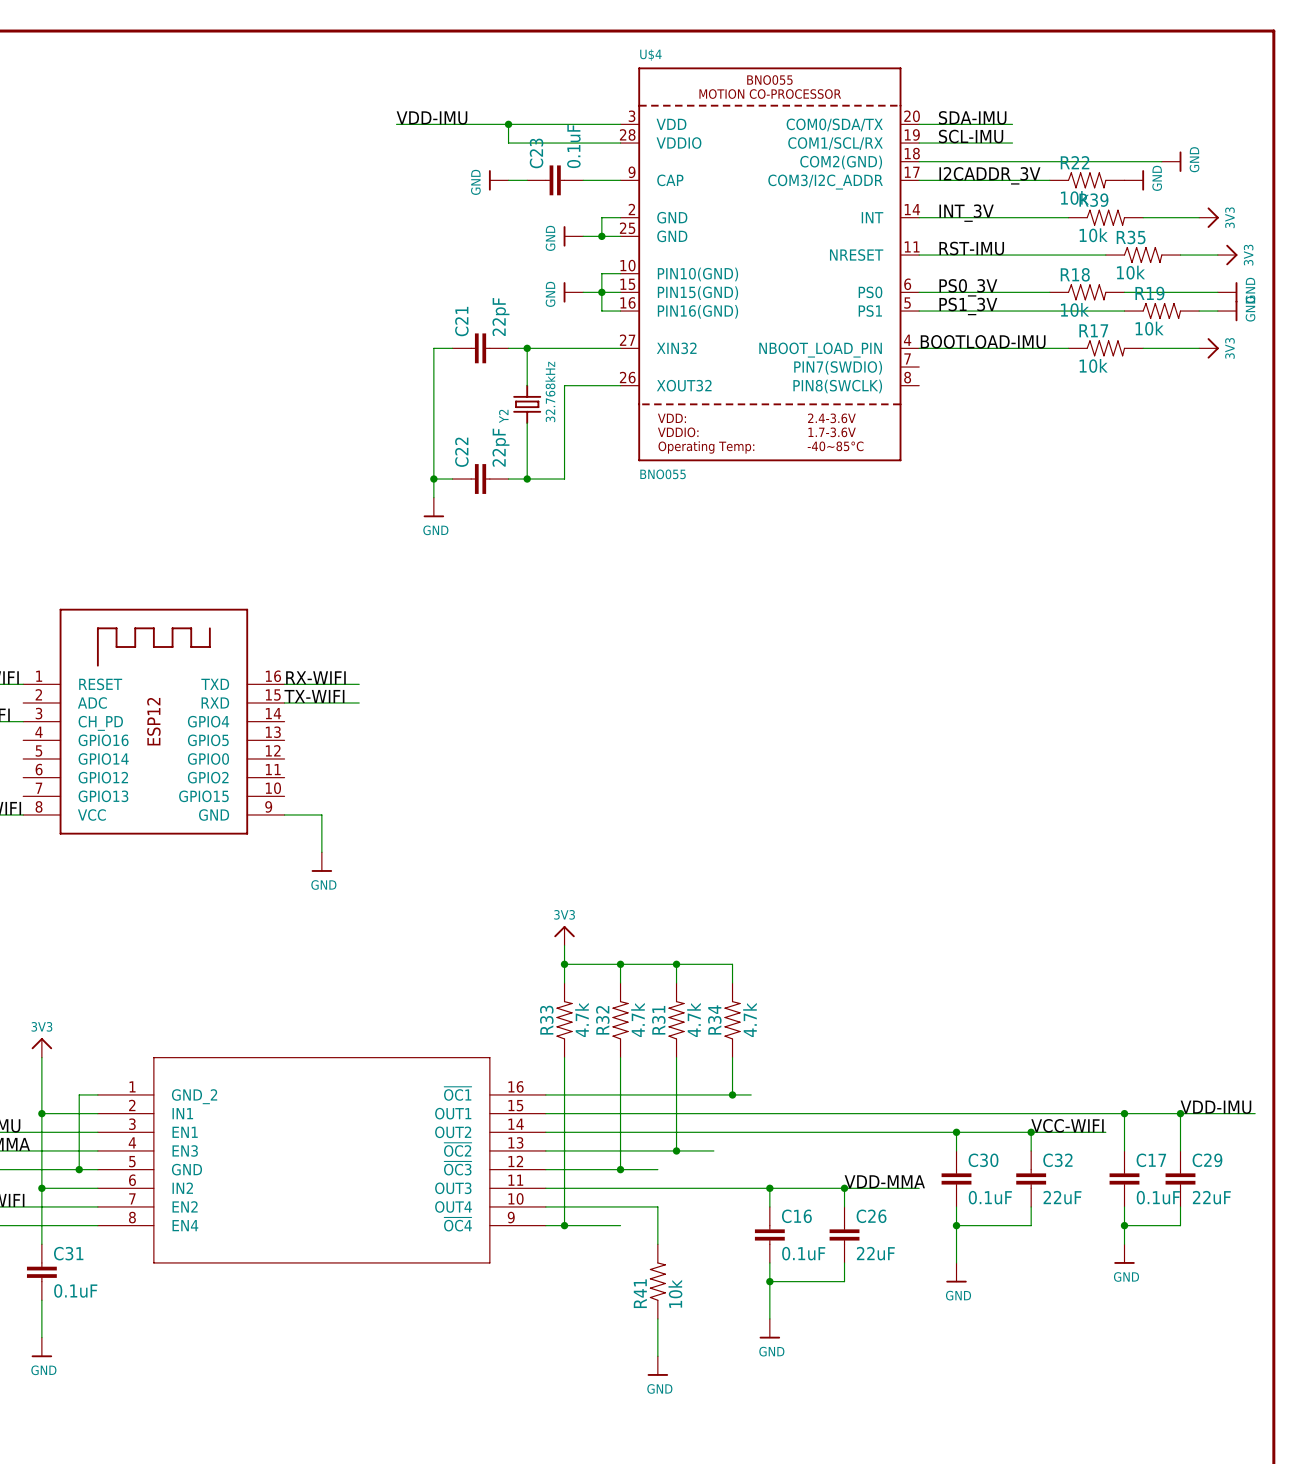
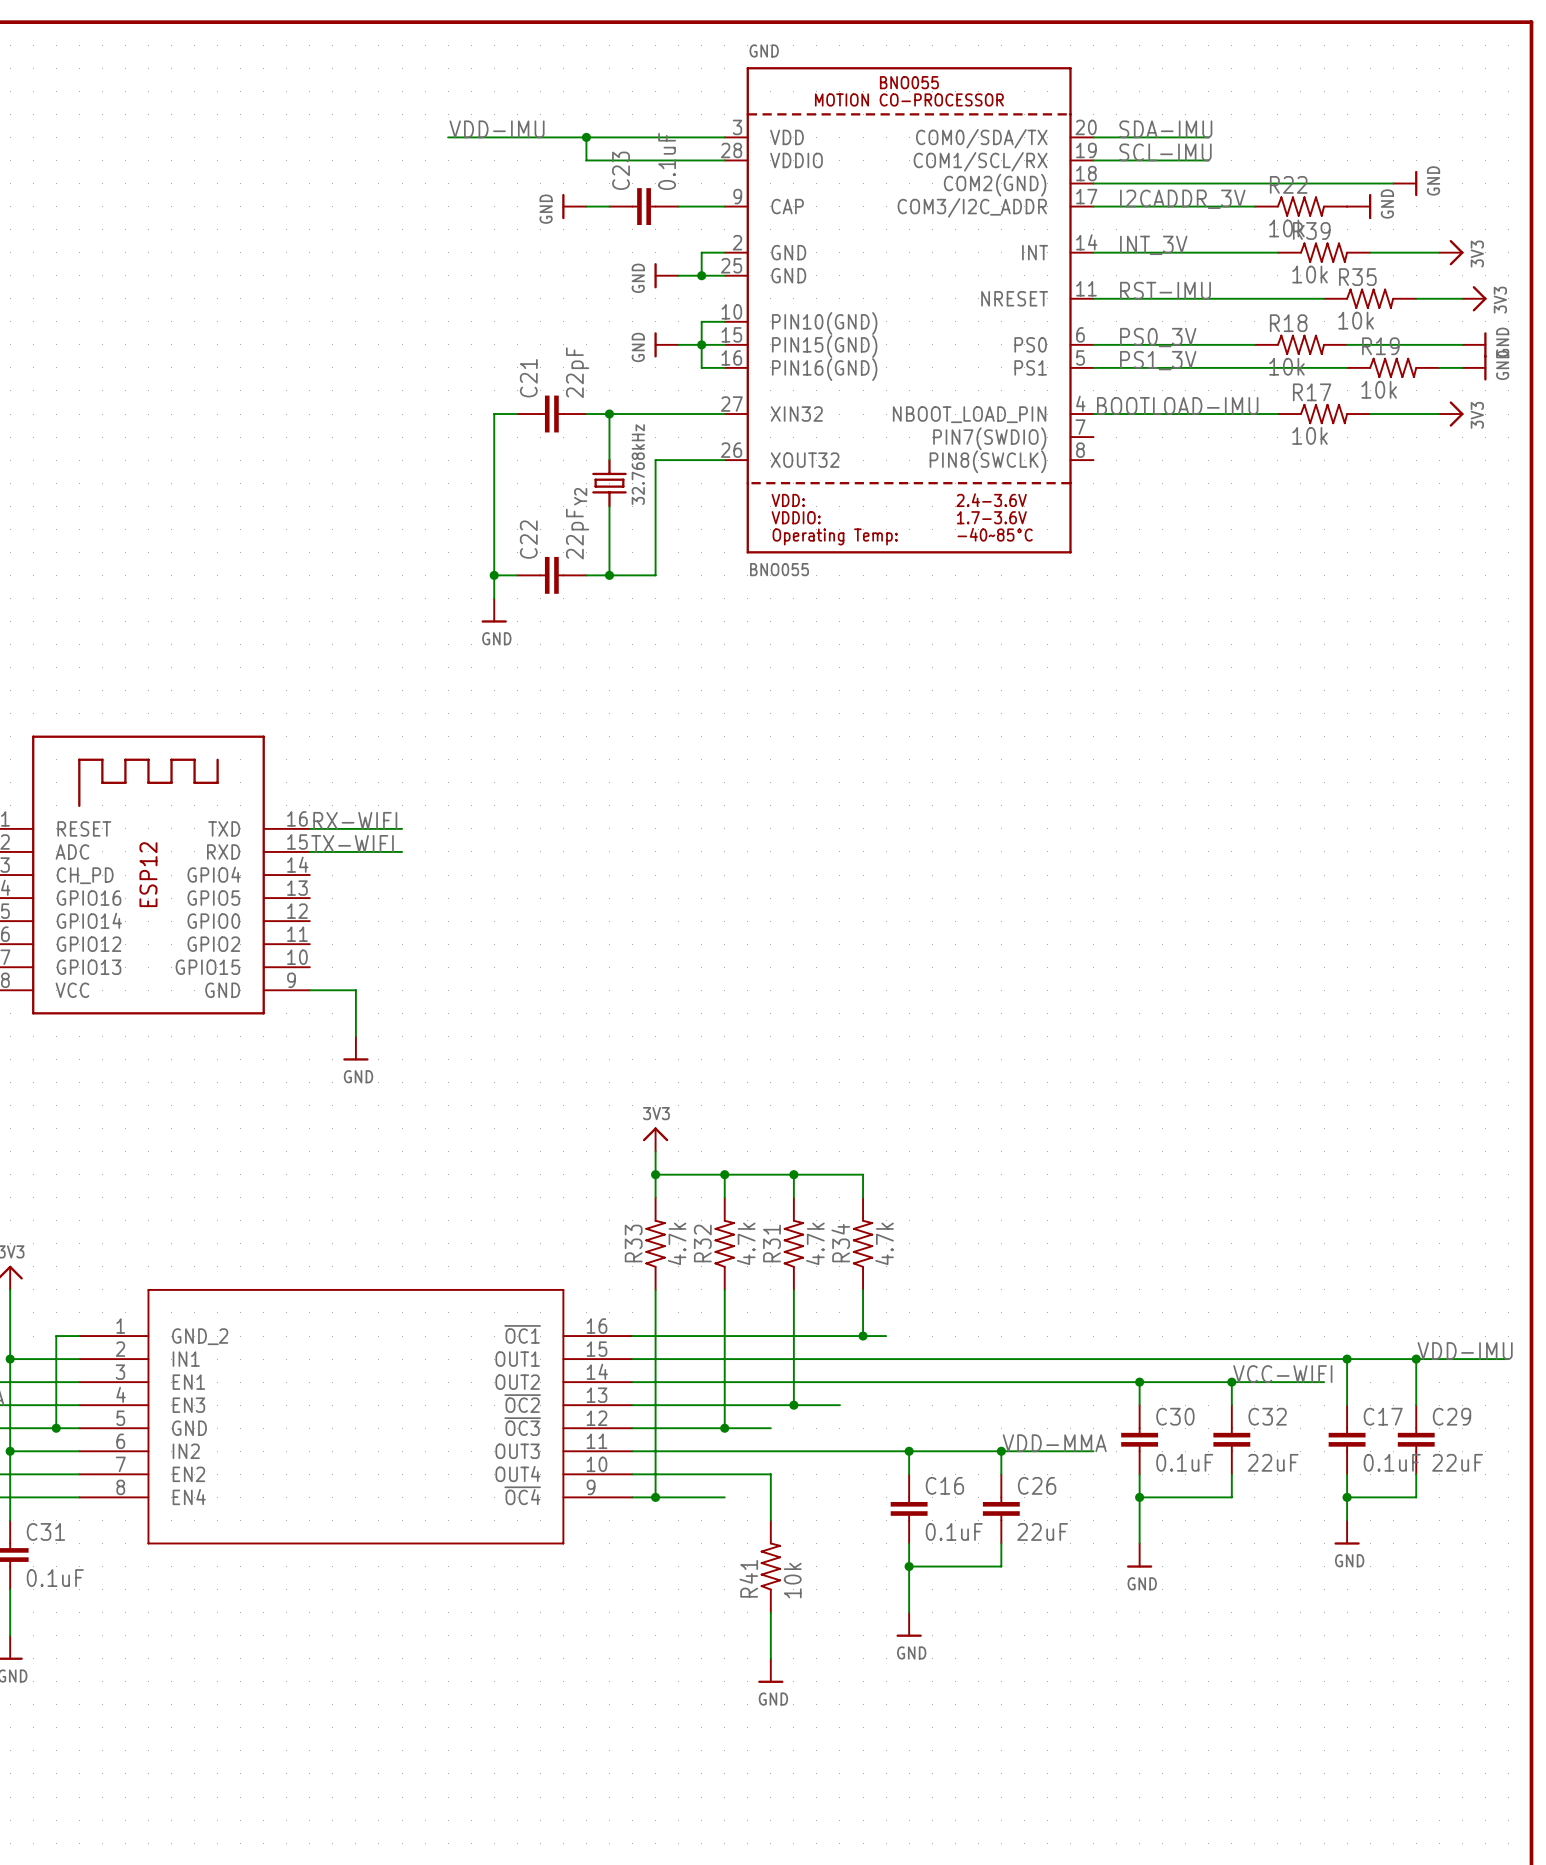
U$4 name: U$4 (650, 55) -> GND (764, 50)

